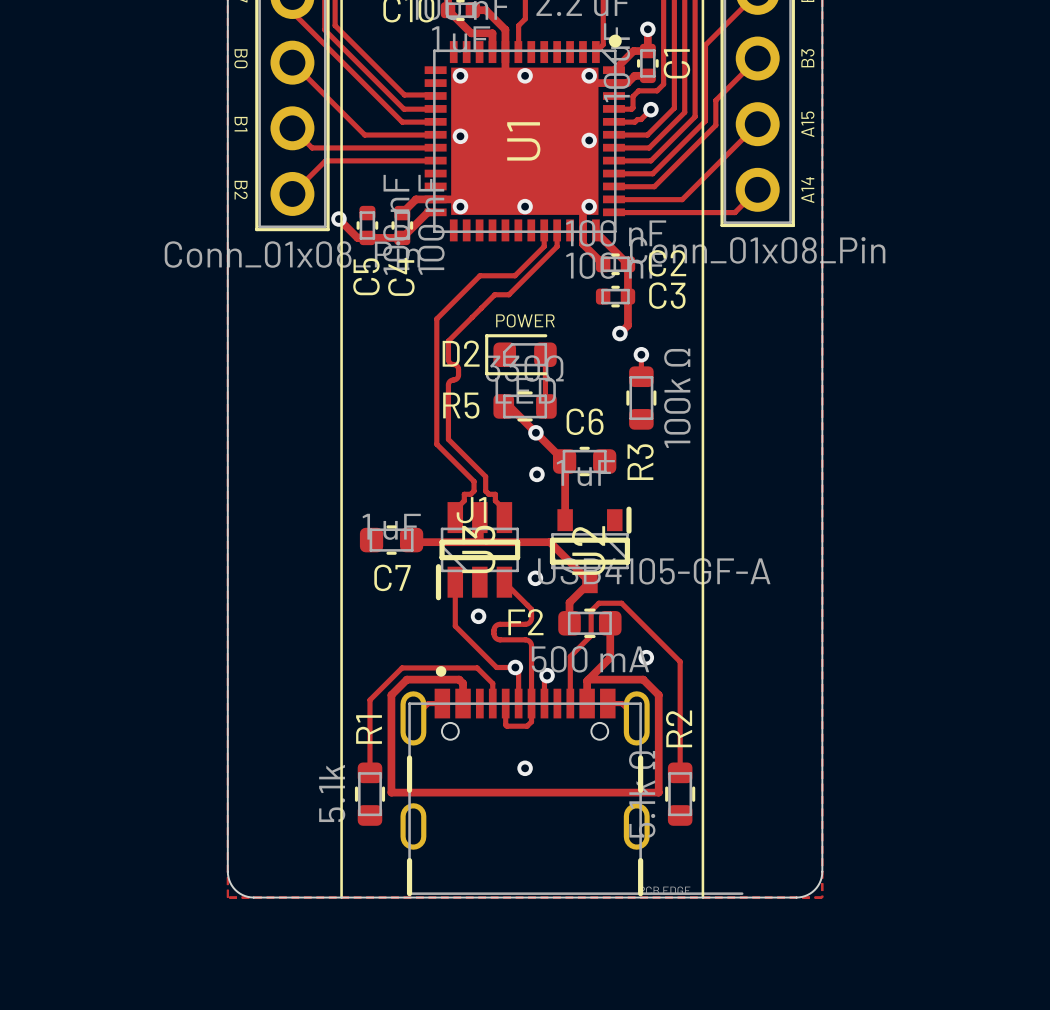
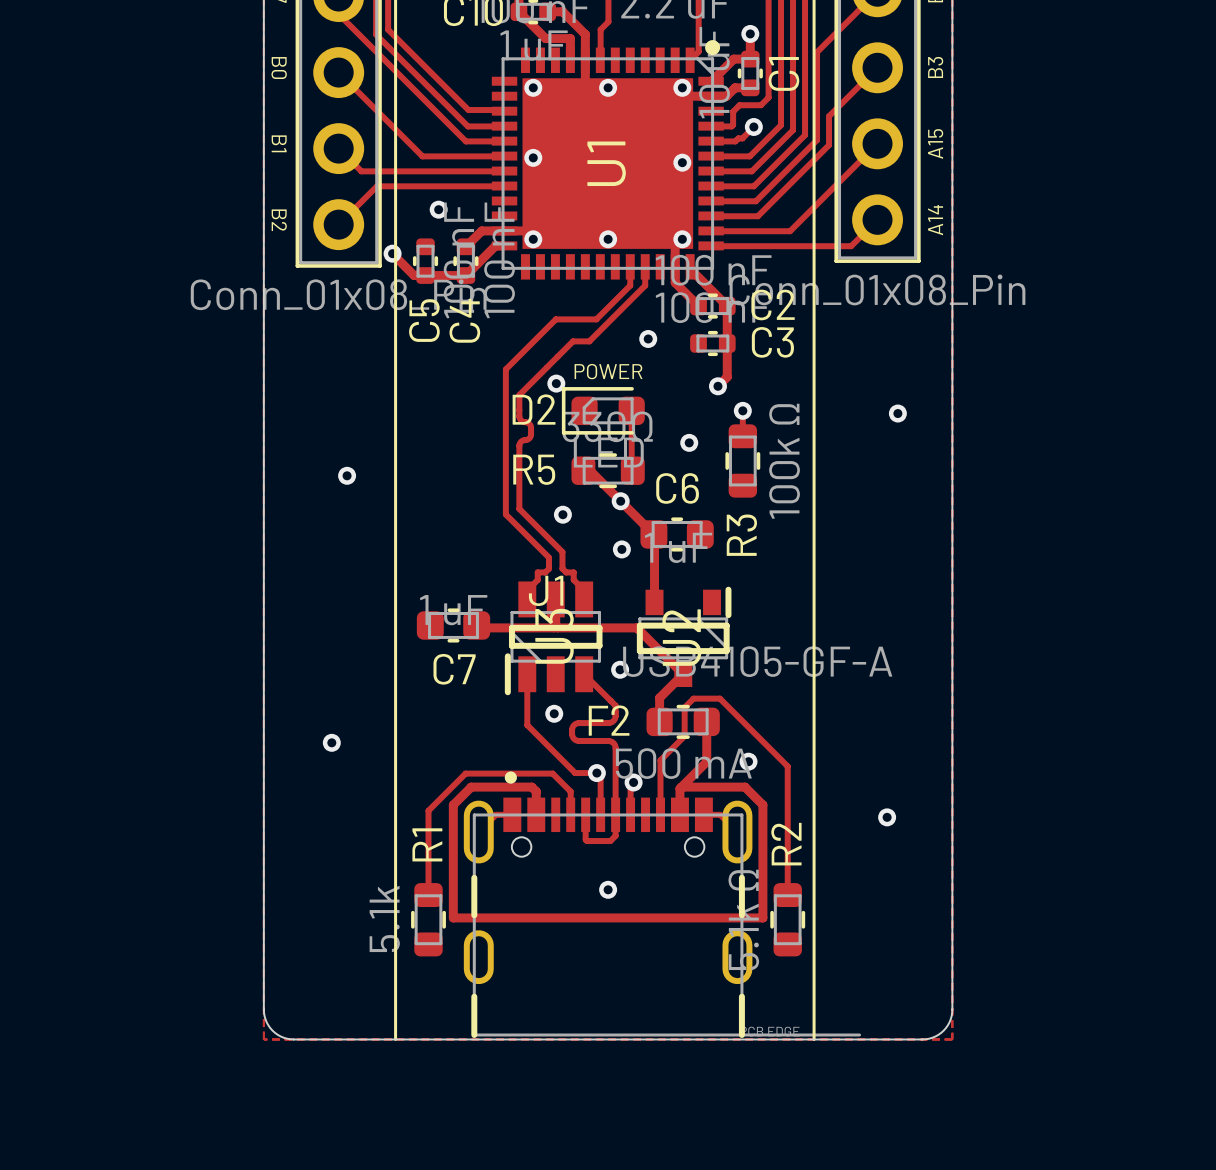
via: none -> (438, 209)
via: none -> (648, 338)
via: none -> (556, 383)
via: none -> (897, 413)
via: none -> (689, 442)
via: none -> (347, 475)
via: none -> (562, 514)
via: none -> (331, 742)
via: none -> (887, 817)

